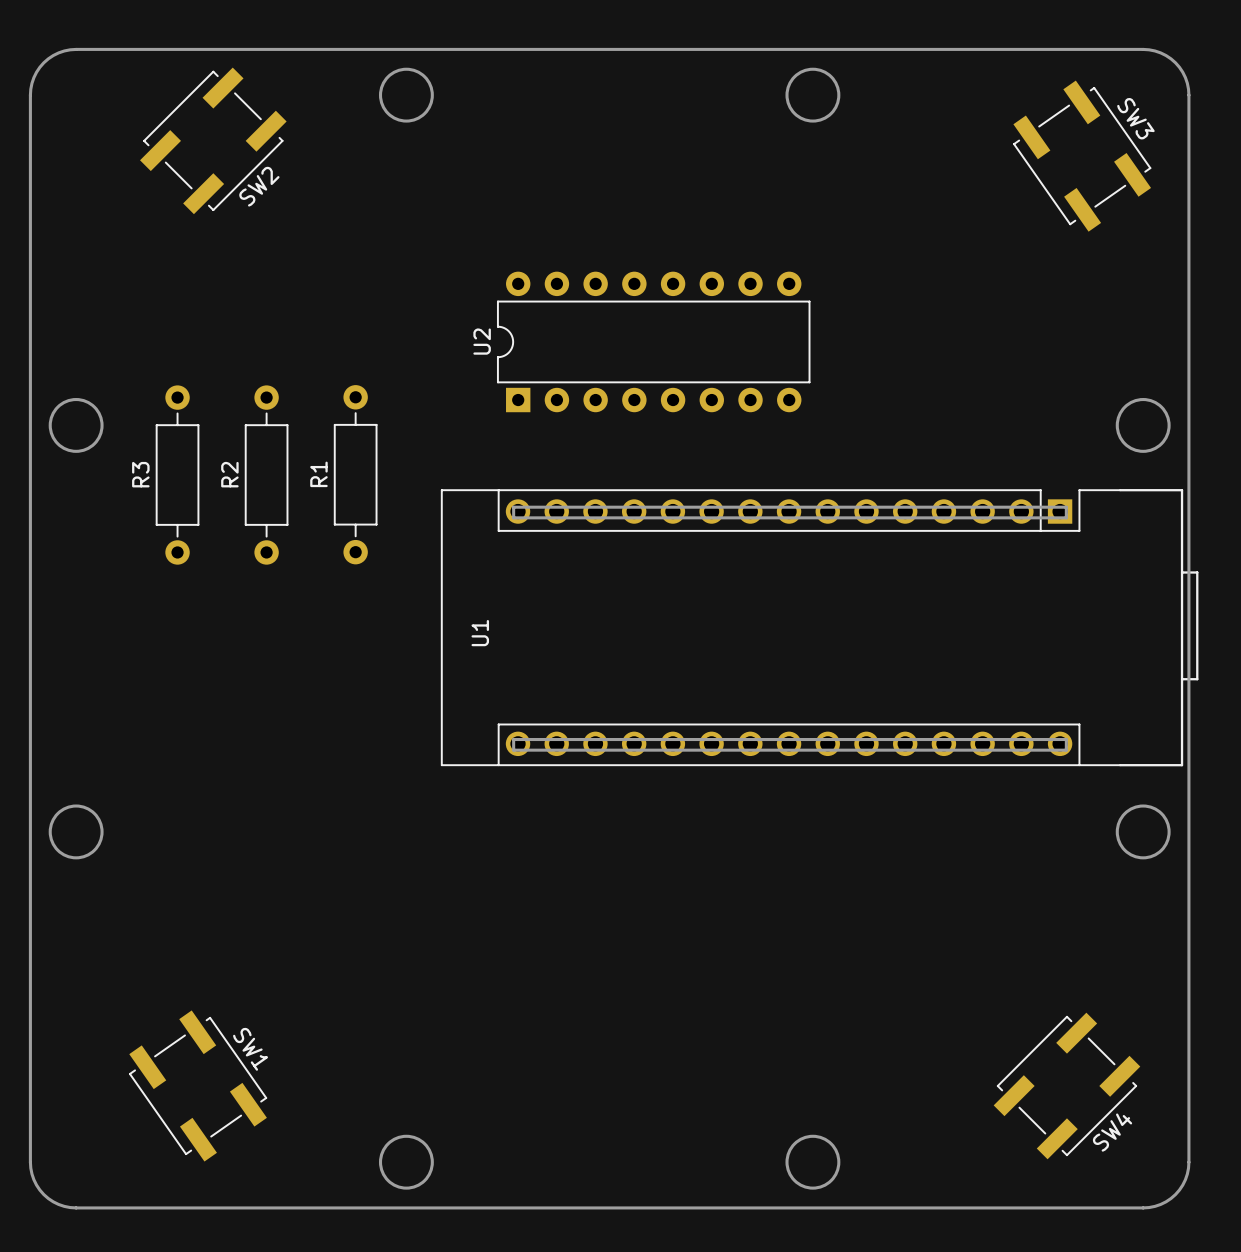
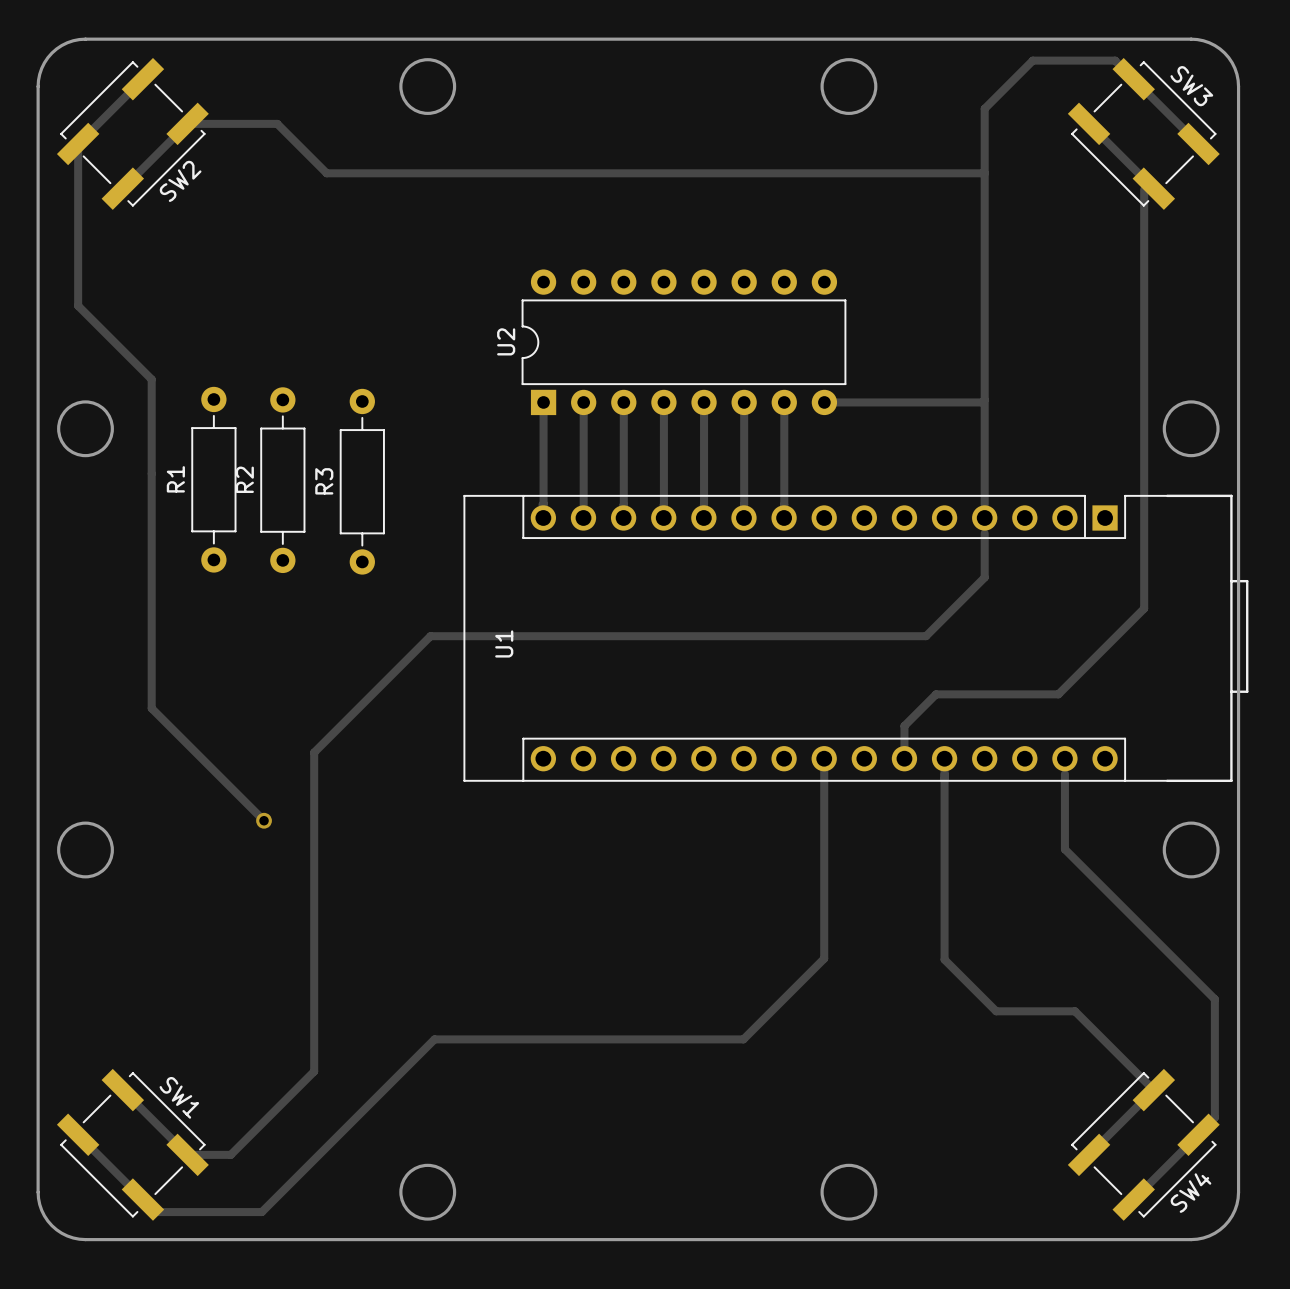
track: none -> (142, 79) (78, 143) (78, 305) (151, 379) (151, 708) (264, 820)
track: none -> (1089, 123) (1153, 188)
SW2 position: (213, 140) -> (132, 133)
track: none -> (1198, 143) (1115, 60) (1032, 60) (984, 108) (984, 504)
SW3 rotation: 0° (1082, 156) -> 10° counterclockwise (1143, 133)
track: none -> (984, 173) (326, 173) (277, 123) (187, 123) (122, 188)
track: none -> (1144, 189) (1144, 608) (1058, 694) (936, 694) (904, 725) (904, 758)
track: none -> (984, 399) (982, 402) (824, 402)
track: none -> (543, 402) (543, 517)
track: none -> (583, 402) (583, 517)
track: none -> (623, 402) (623, 504)
track: none -> (663, 402) (663, 504)
track: none -> (704, 402) (704, 504)
track: none -> (744, 402) (744, 504)
track: none -> (784, 402) (784, 504)
R1 position: (355, 474) -> (213, 479)
R3 position: (177, 475) -> (362, 481)
board edge: (513, 507) (1066, 507) (1066, 517) (513, 517) (513, 507) -> none
track: none -> (984, 533) (984, 577) (926, 636) (430, 636) (314, 752) (314, 1071) (230, 1154) (187, 1154) (122, 1090)
board edge: (513, 739) (1066, 739) (1066, 750) (513, 750) (513, 739) -> none
track: none -> (824, 758) (824, 958) (743, 1039) (434, 1039) (261, 1212) (154, 1212) (78, 1134)
track: none -> (944, 758) (944, 959) (996, 1011) (1075, 1011) (1153, 1090) (1089, 1154)
track: none -> (1064, 774) (1064, 849) (1214, 999) (1214, 1117) (1133, 1199)
via: none -> (264, 820)
SW1 rotation: 0° (198, 1085) -> 10° counterclockwise (132, 1144)
SW4 position: (1066, 1085) -> (1143, 1144)

